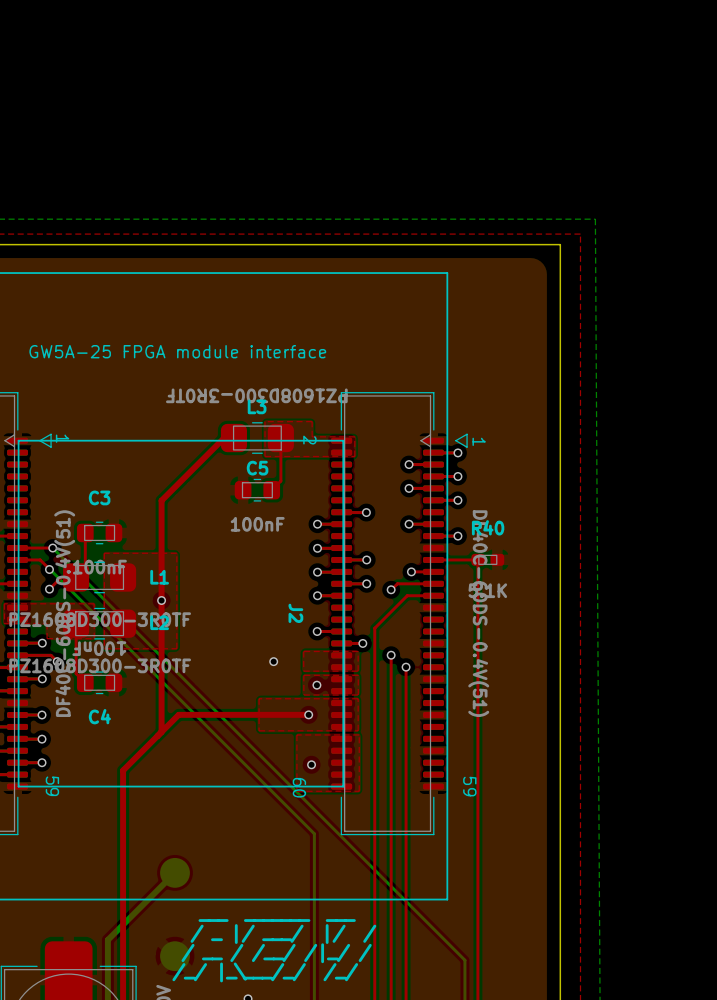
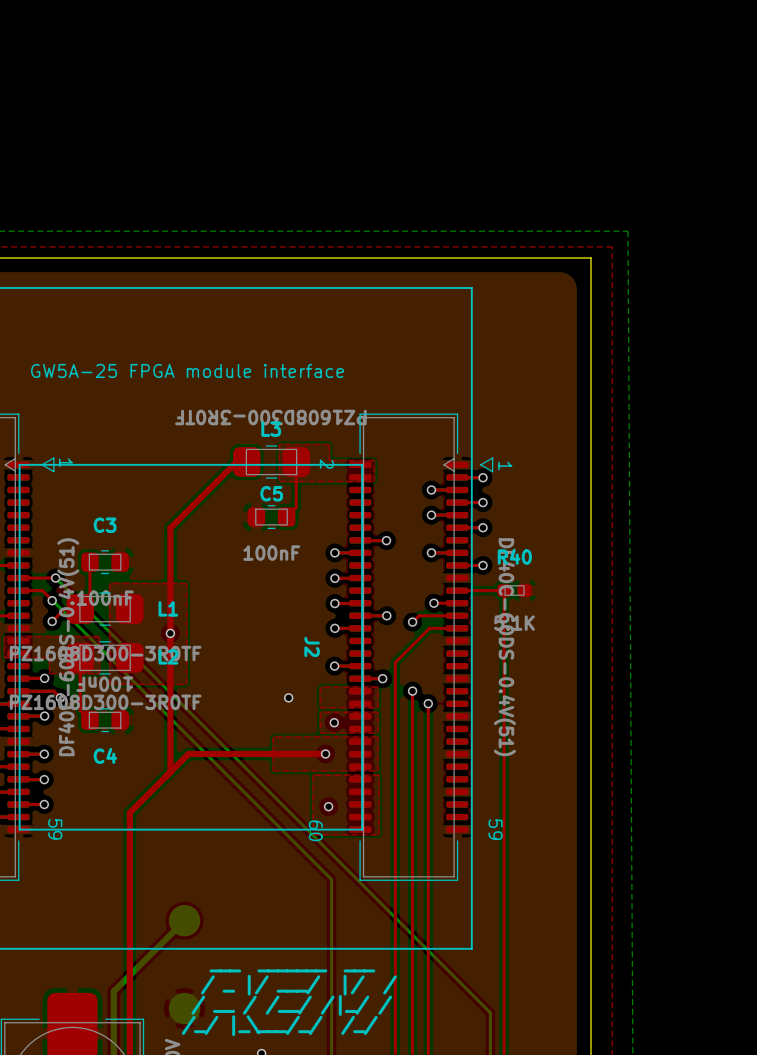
top track: (341, 559) (366, 559) -> none
via: (366, 559) -> none

